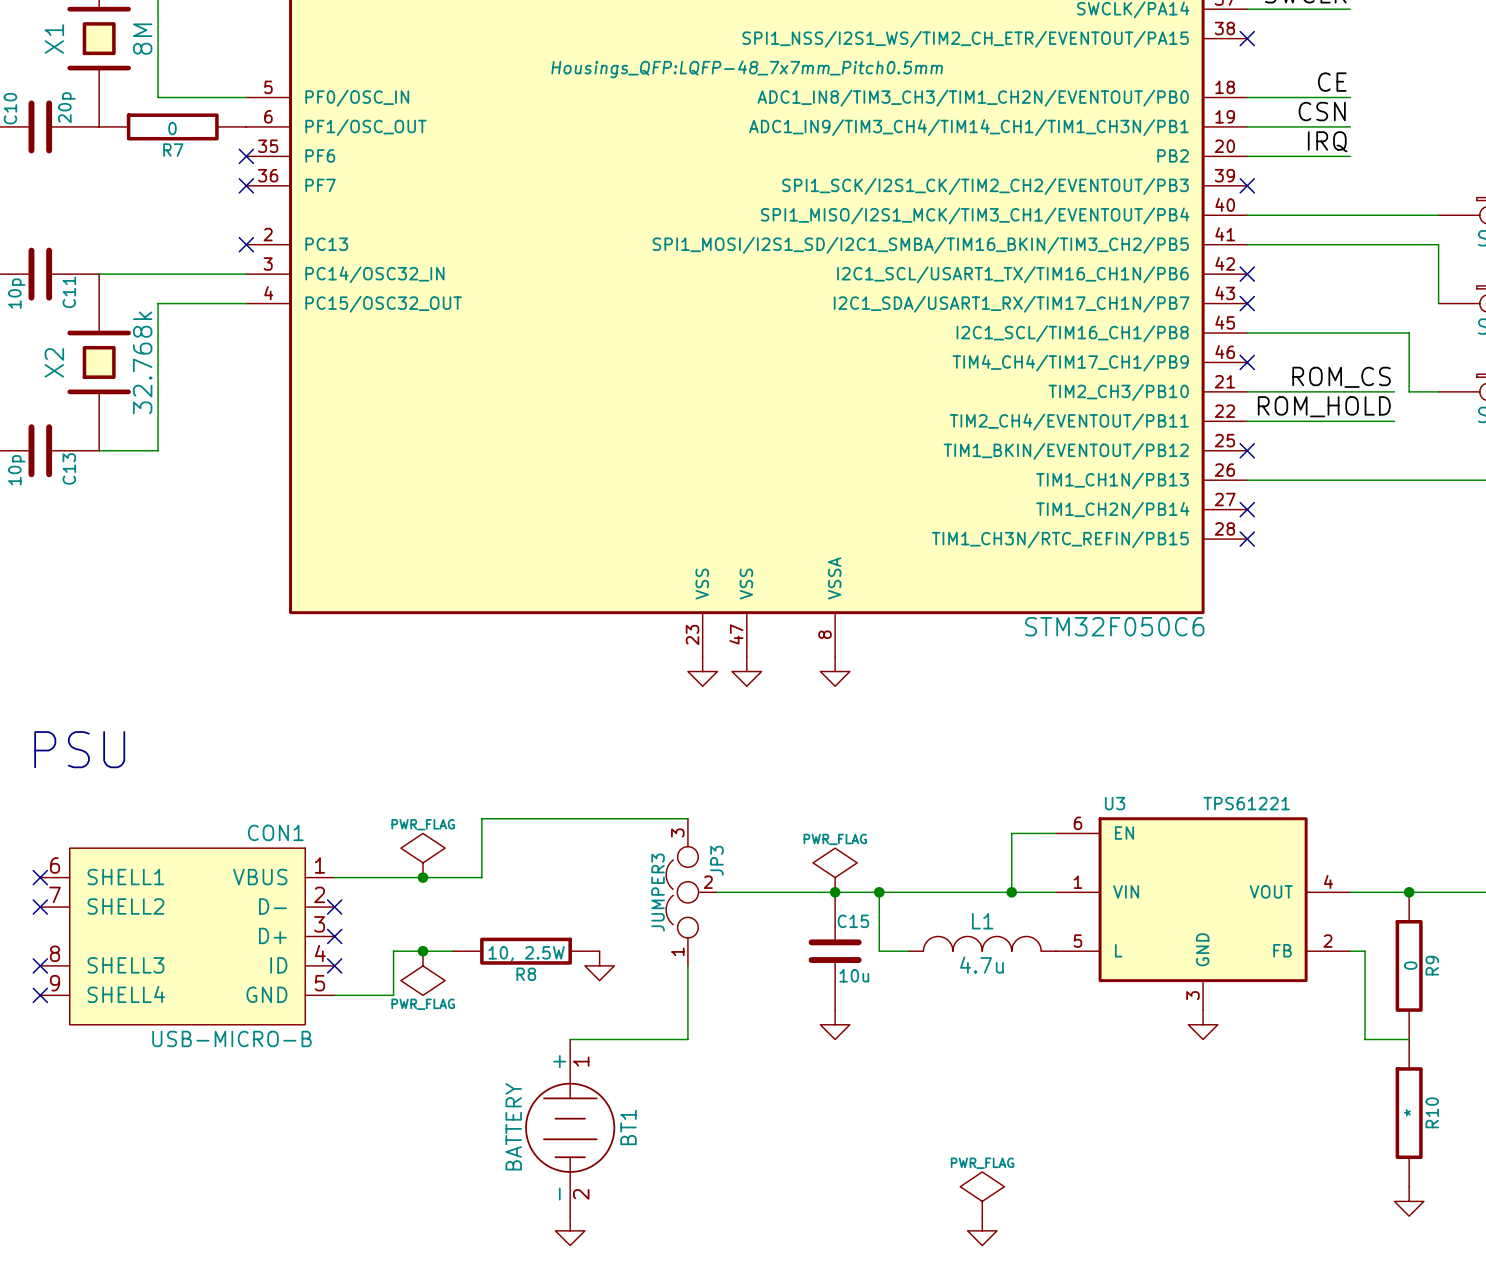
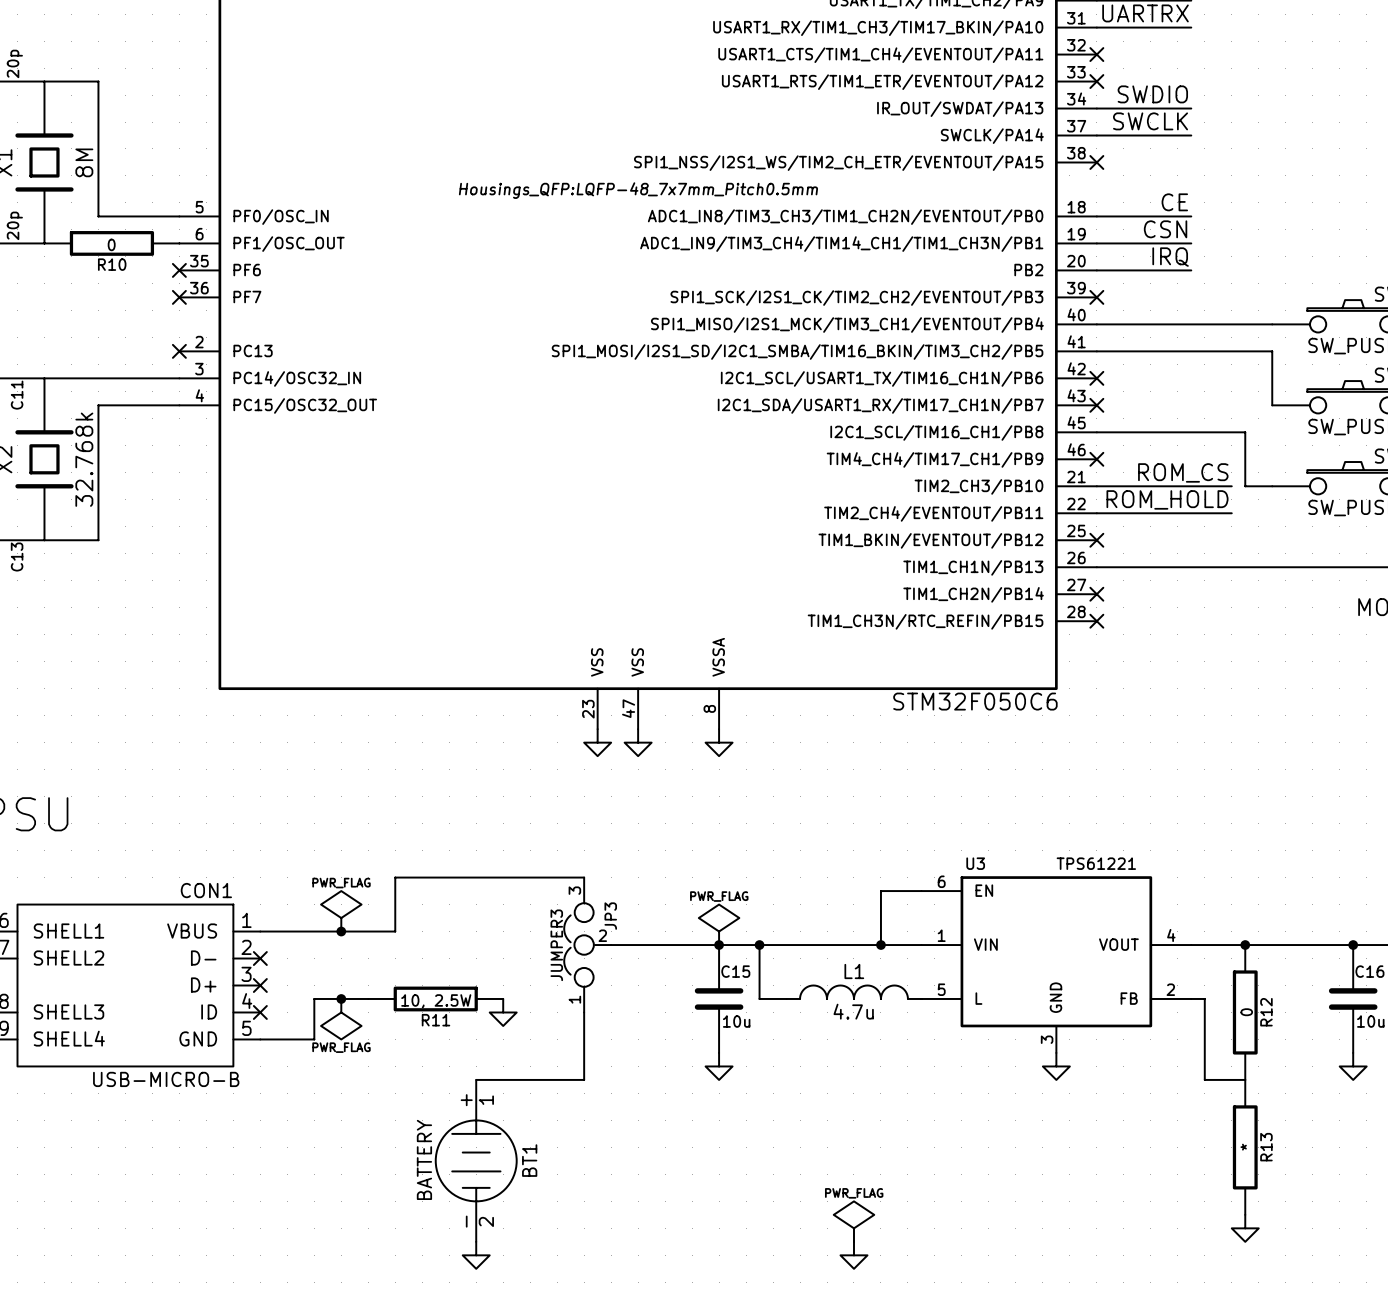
R7 name: R7 (173, 150) -> R10 (112, 264)
R9 name: R9 (1432, 965) -> R12 (1266, 1012)
R8 name: R8 (526, 974) -> R11 (436, 1020)
R10 name: R10 (1432, 1112) -> R13 (1266, 1147)

